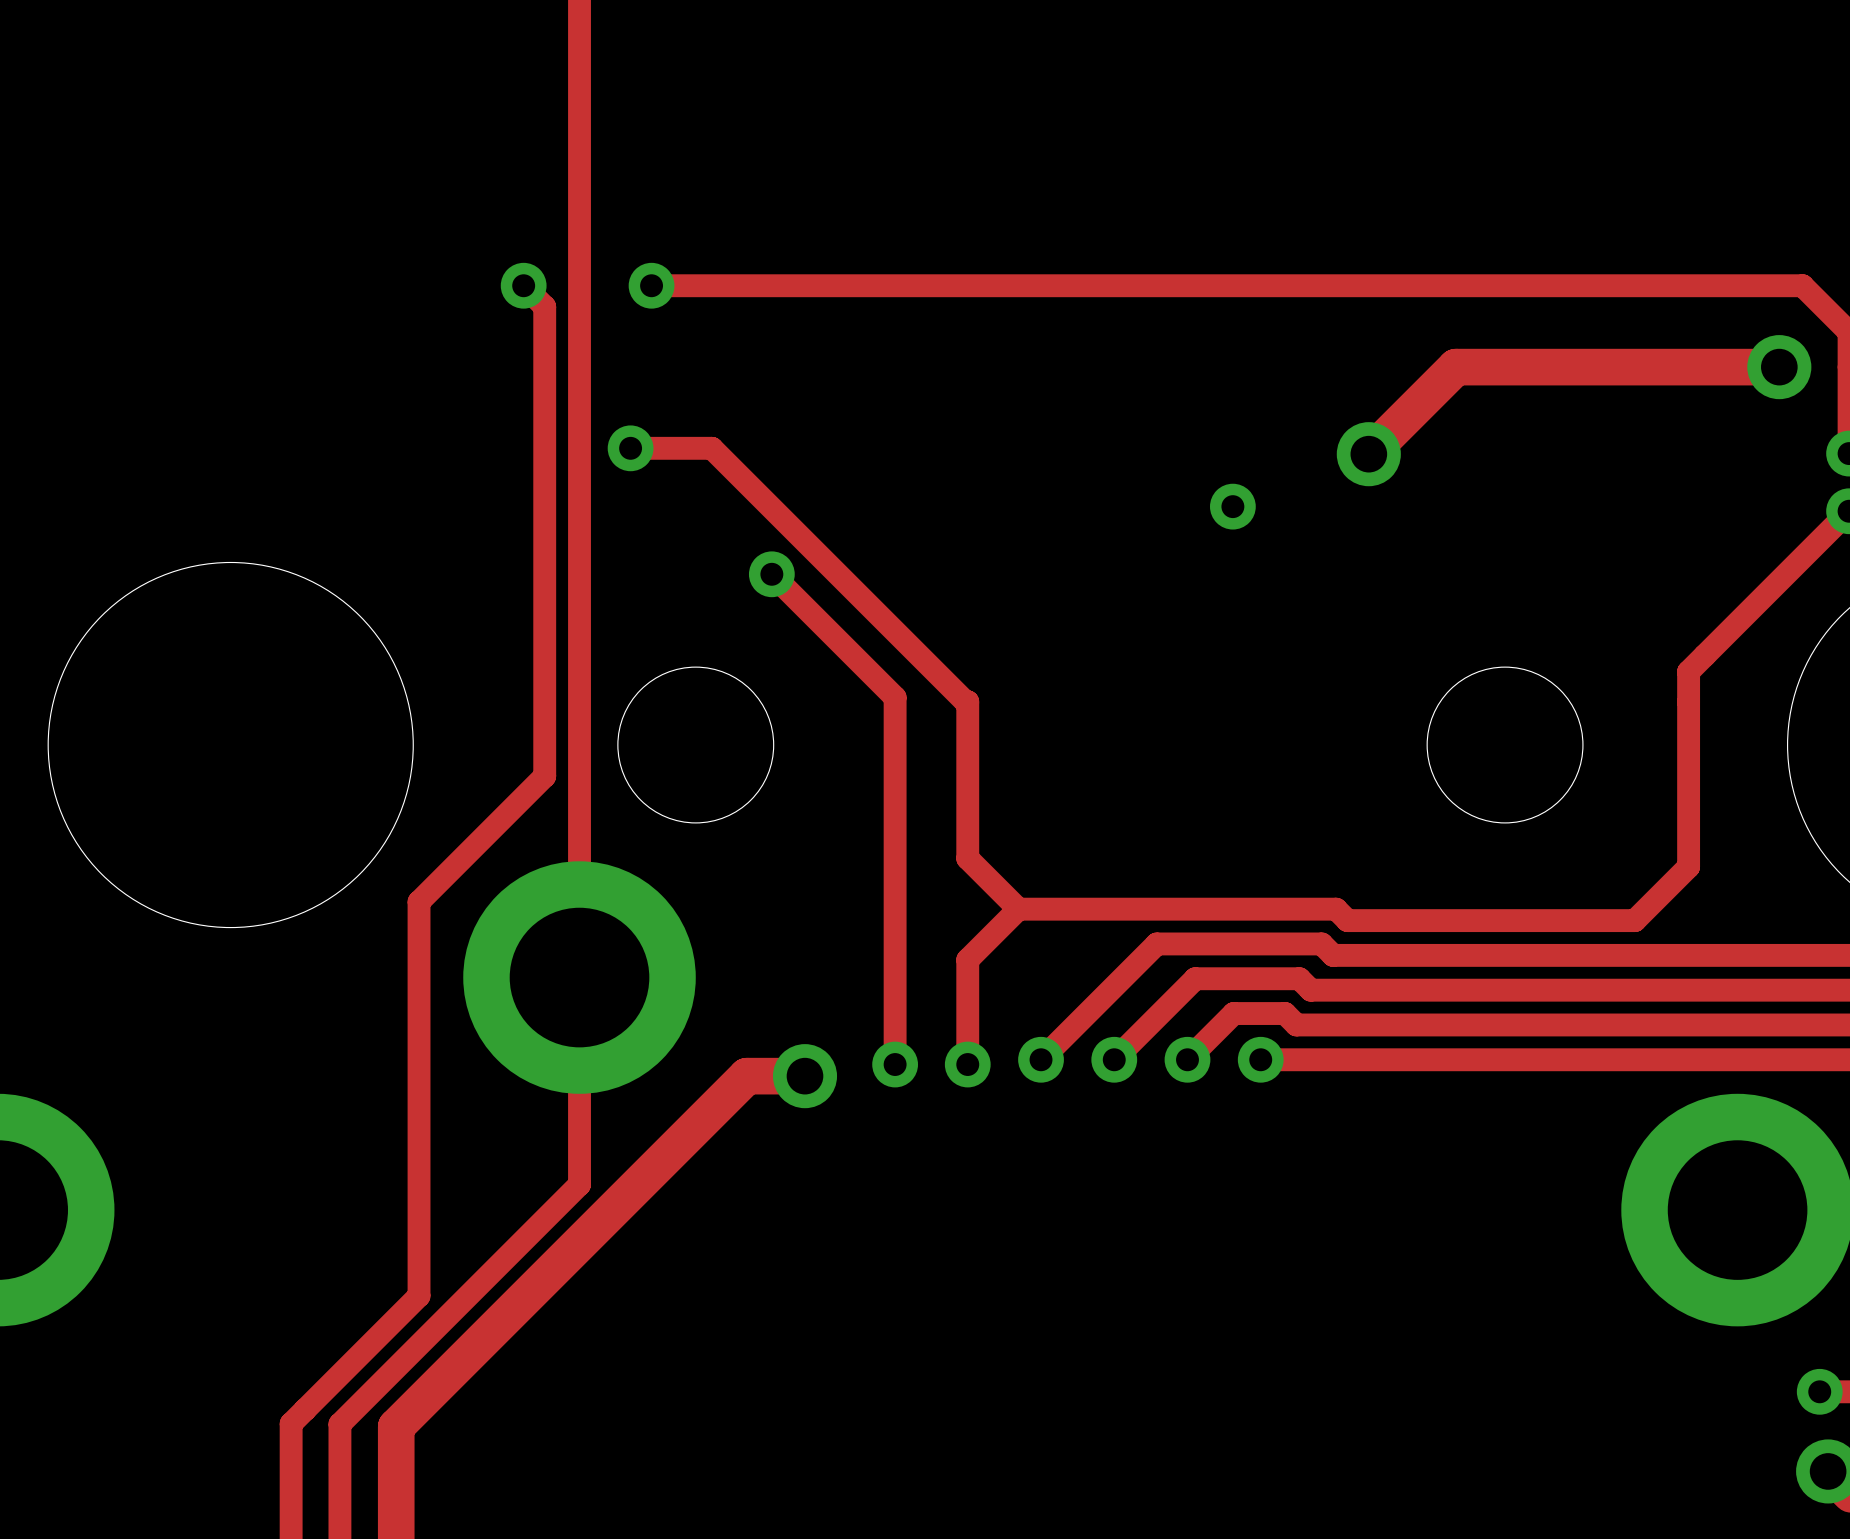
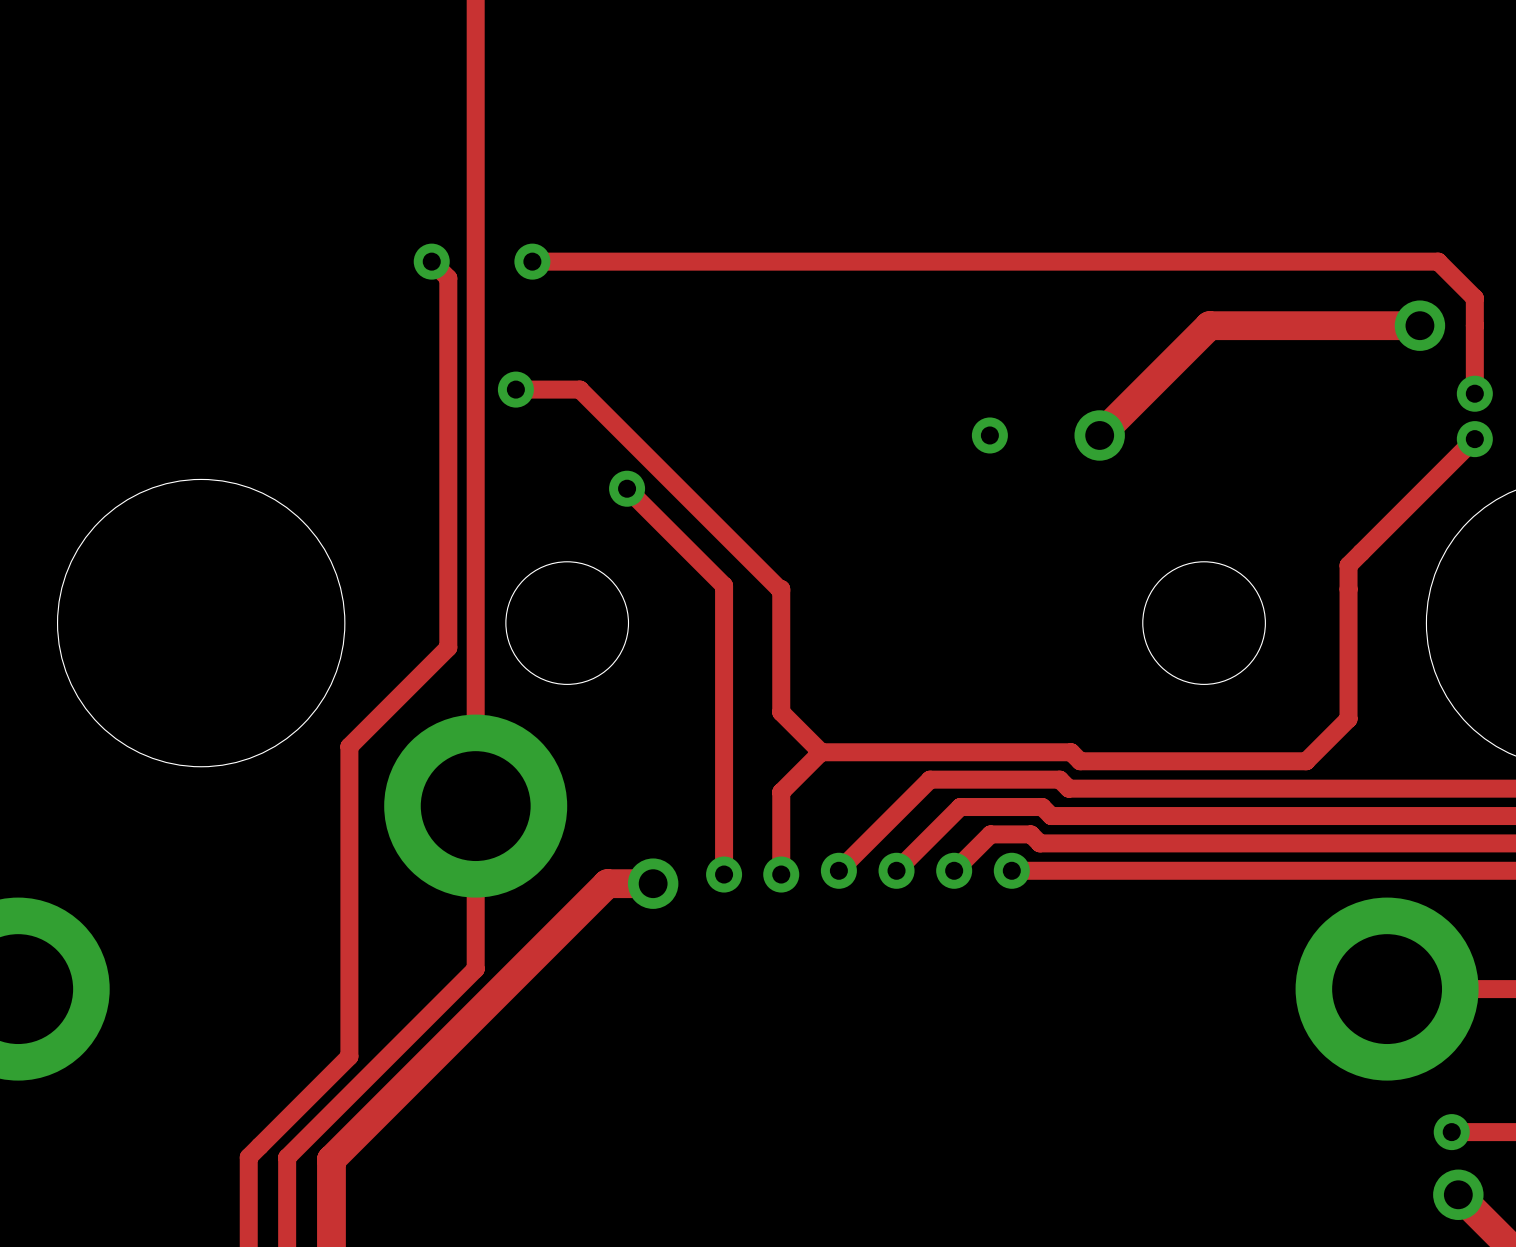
track: (1511, 367) (1455, 367) (1368, 454) -> (1209, 325) (1099, 435)
via position: (1368, 454) -> (1099, 435)

